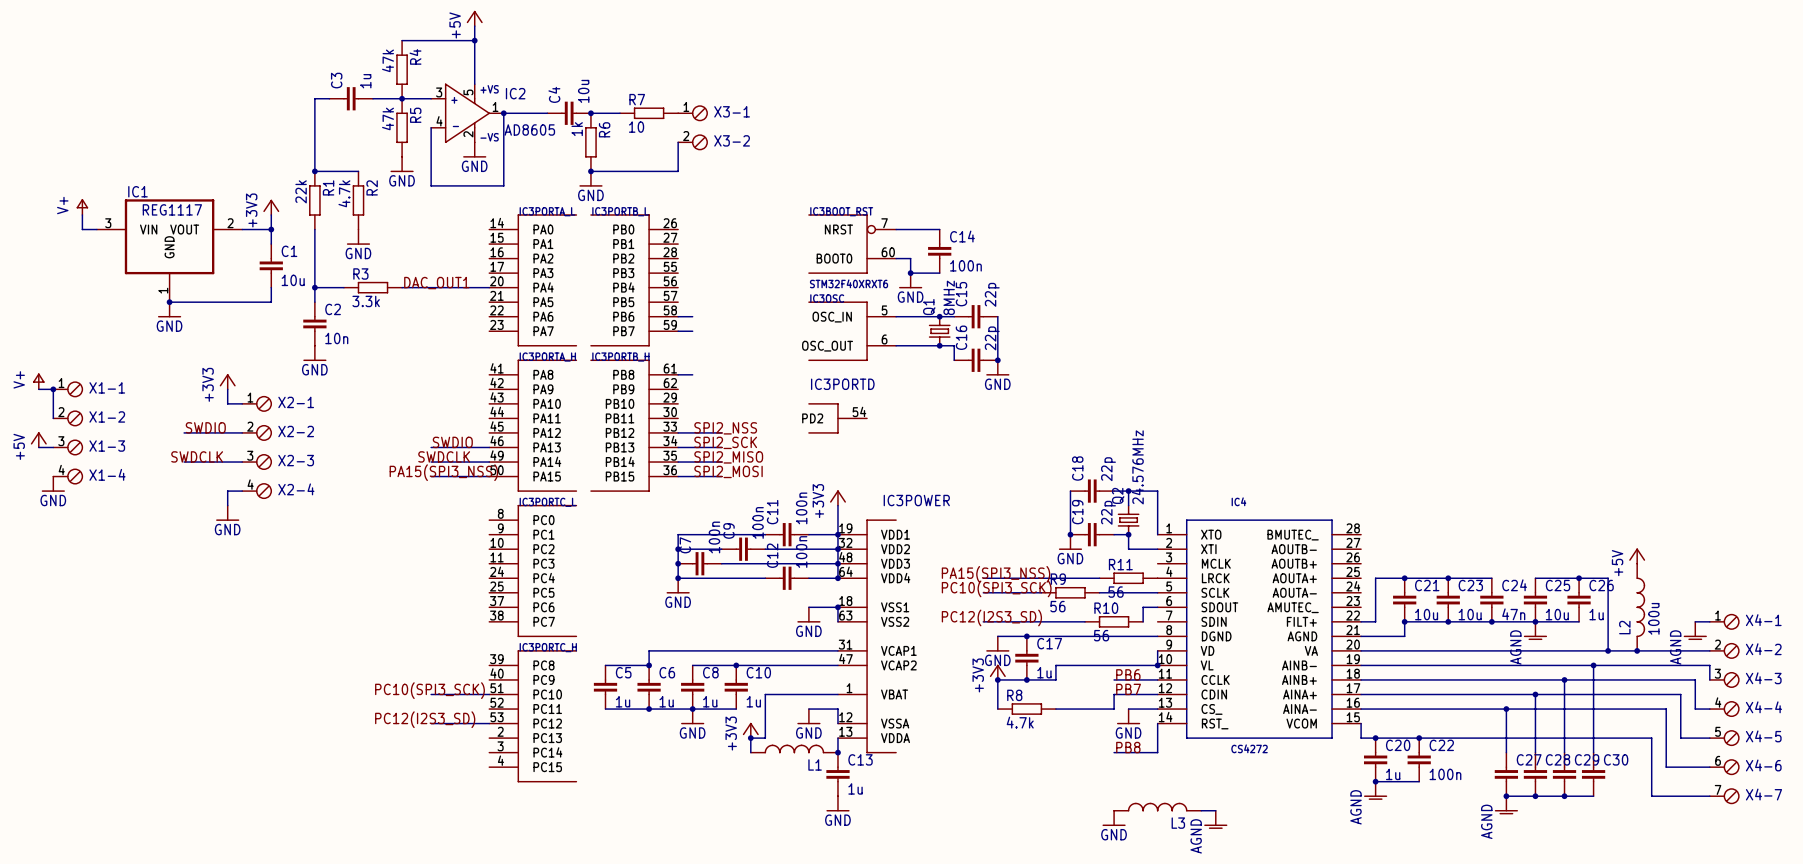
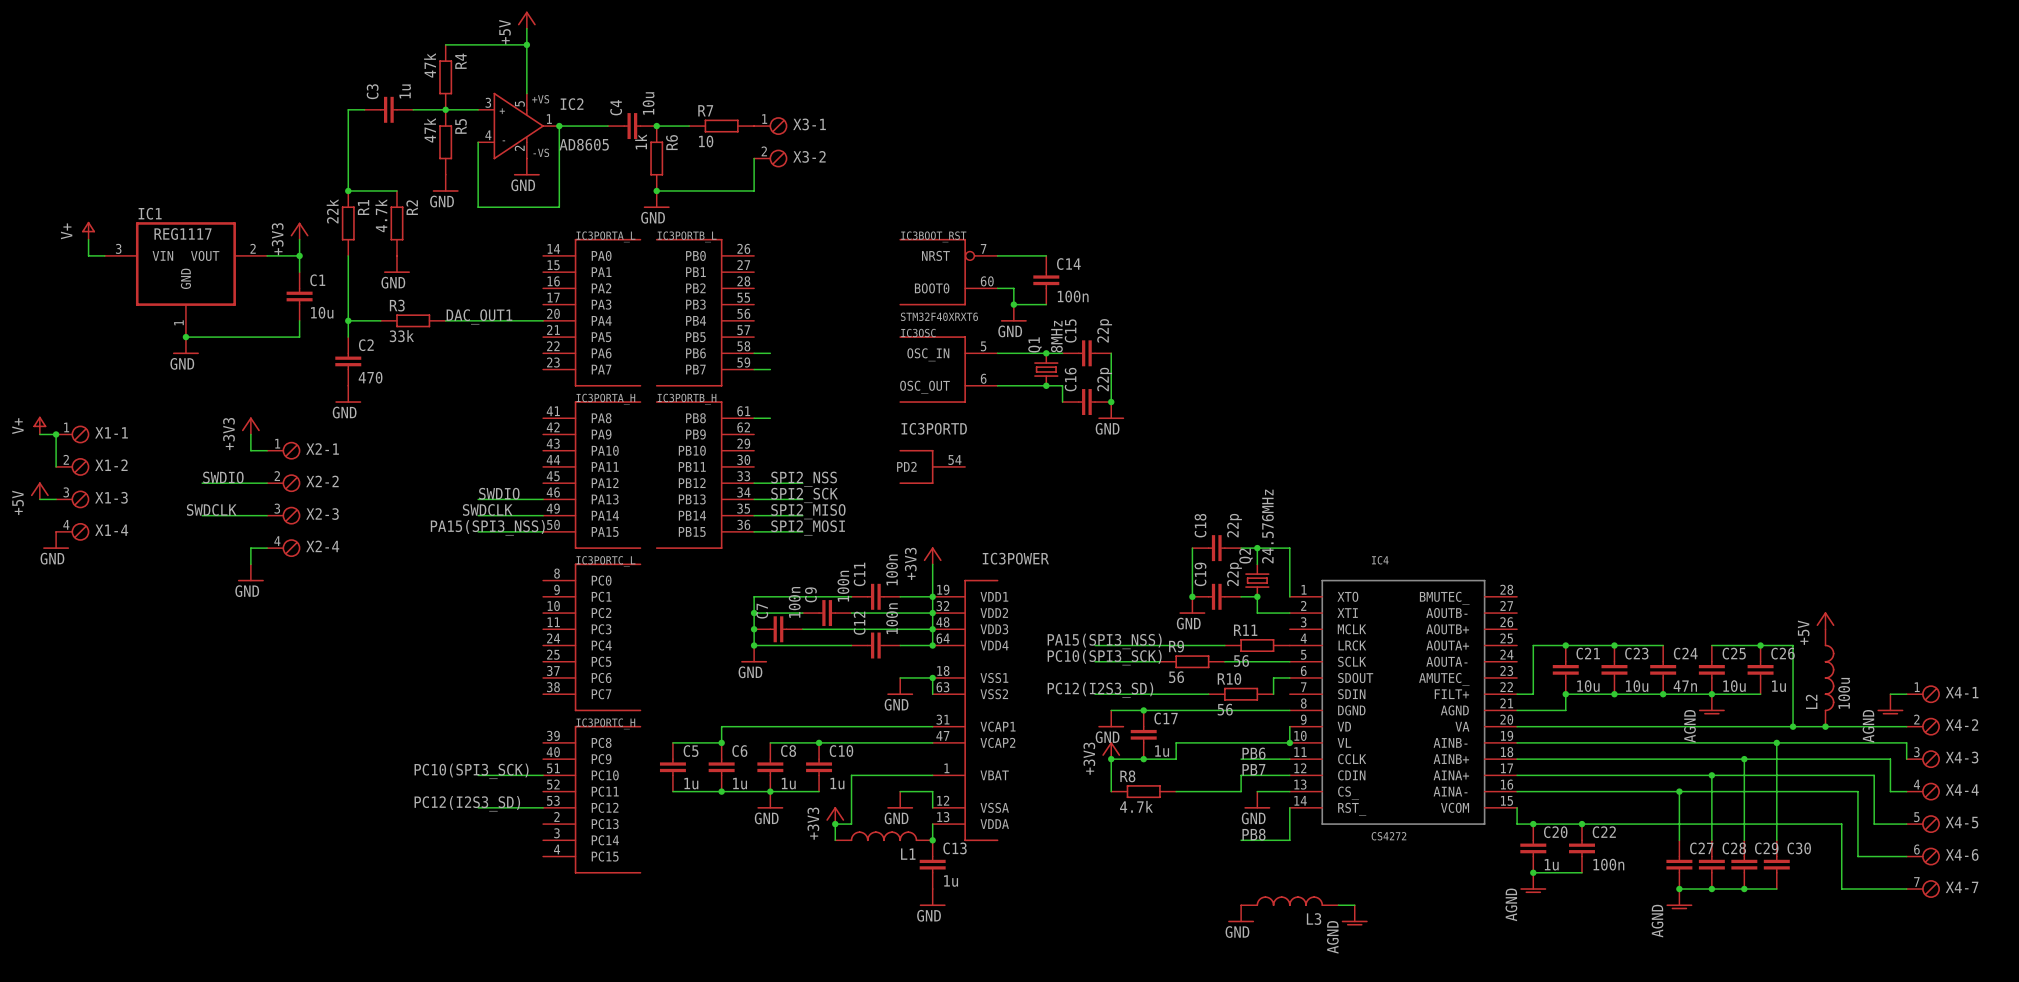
R3 value: 3.3k (366, 301) -> 33k (401, 336)
C2 value: 10n (336, 338) -> 470 (370, 377)

